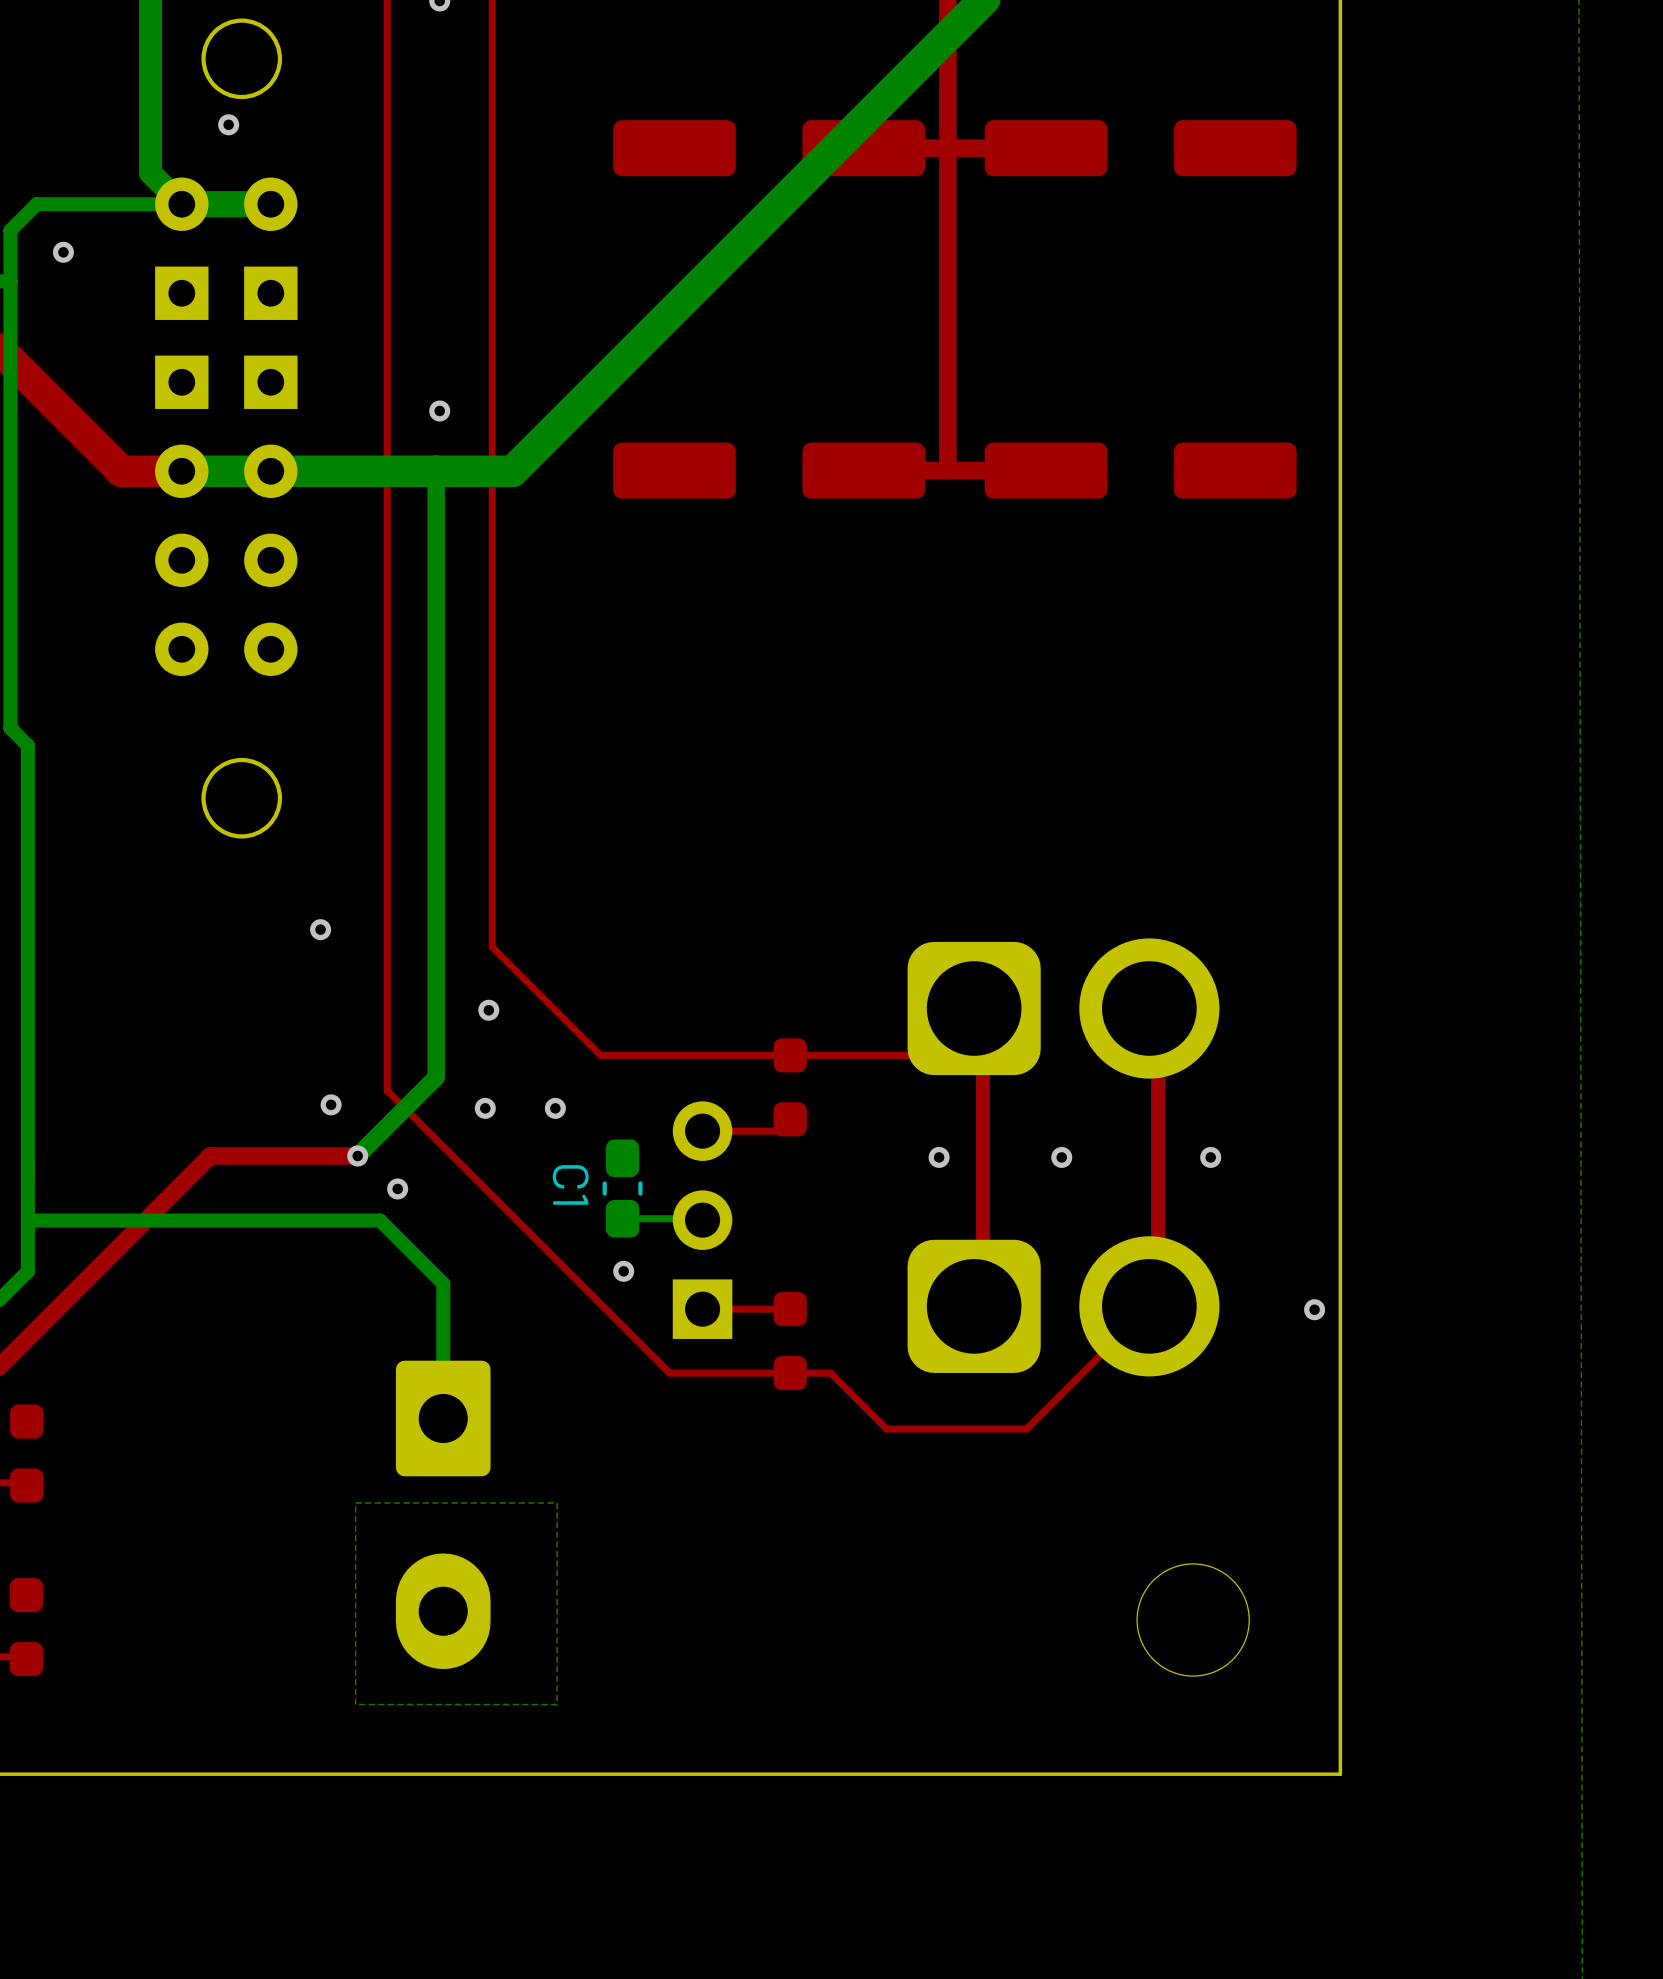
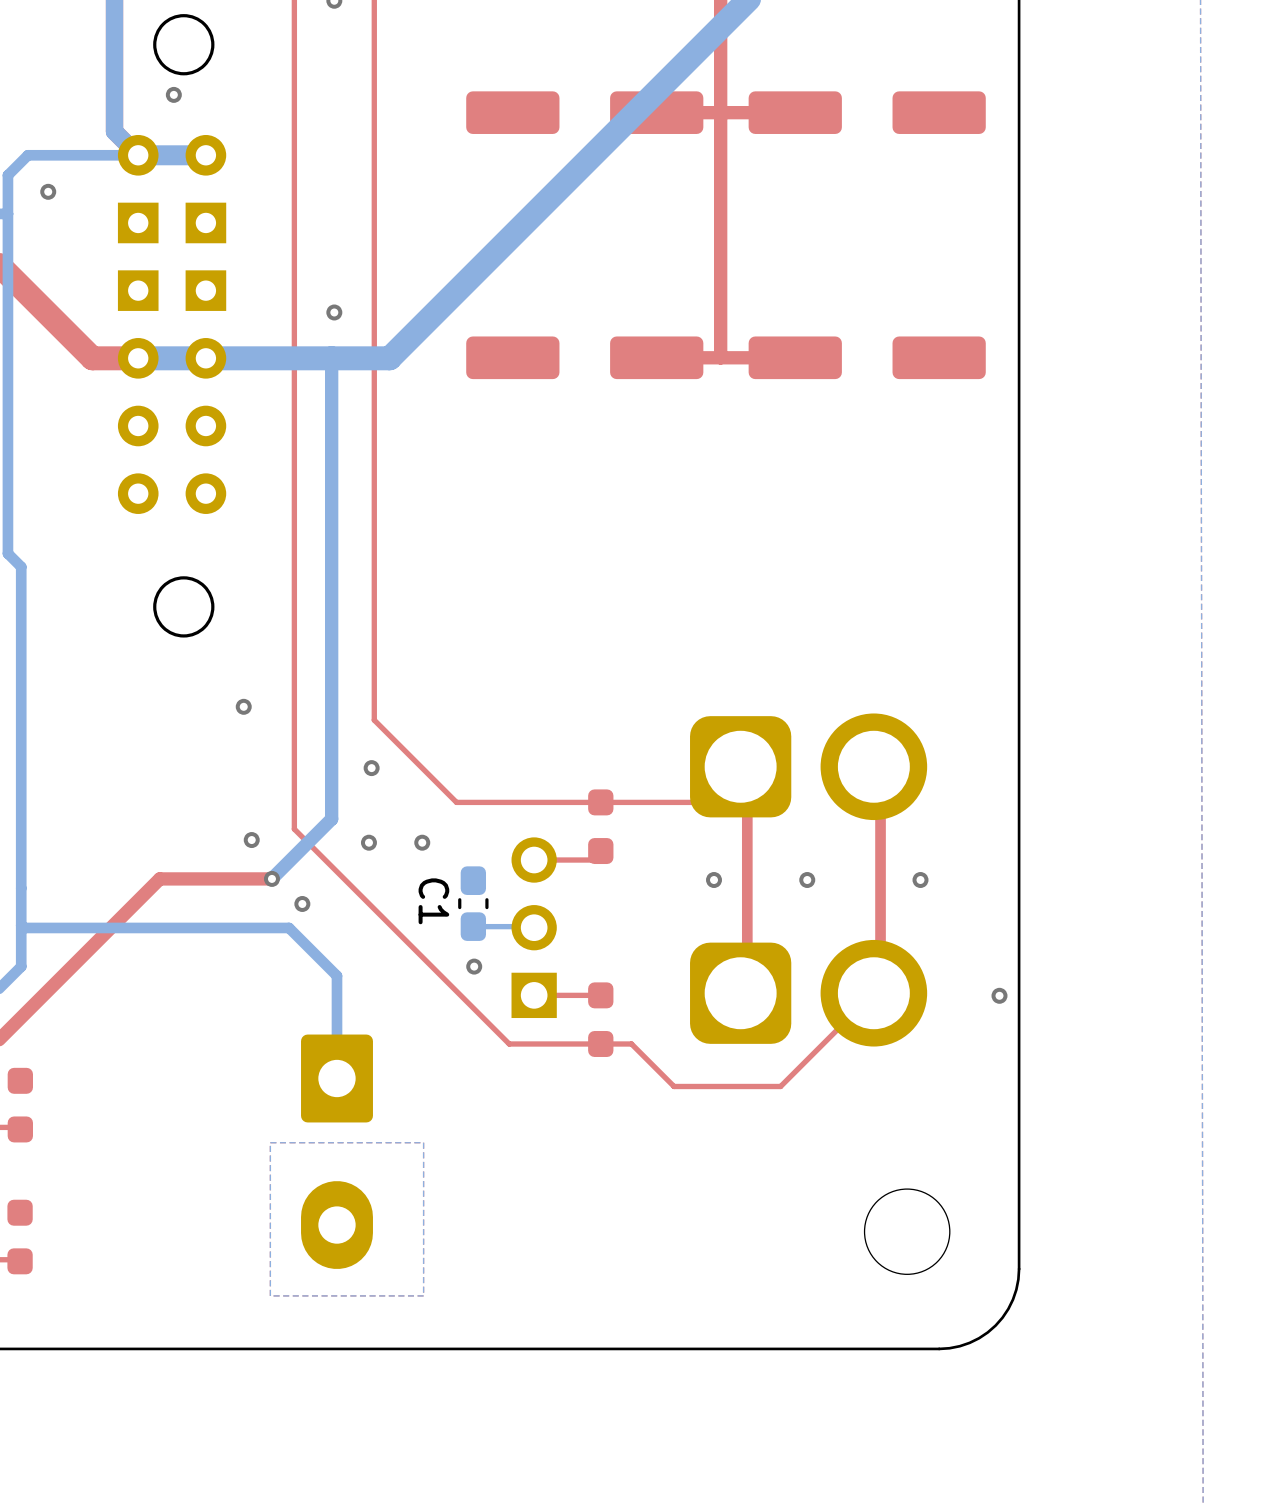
board edge: (1340, 1669) (1340, 1774) (1235, 1774) -> (1019, 1269) (1012, 1299) (995, 1325) (969, 1342) (939, 1348)

